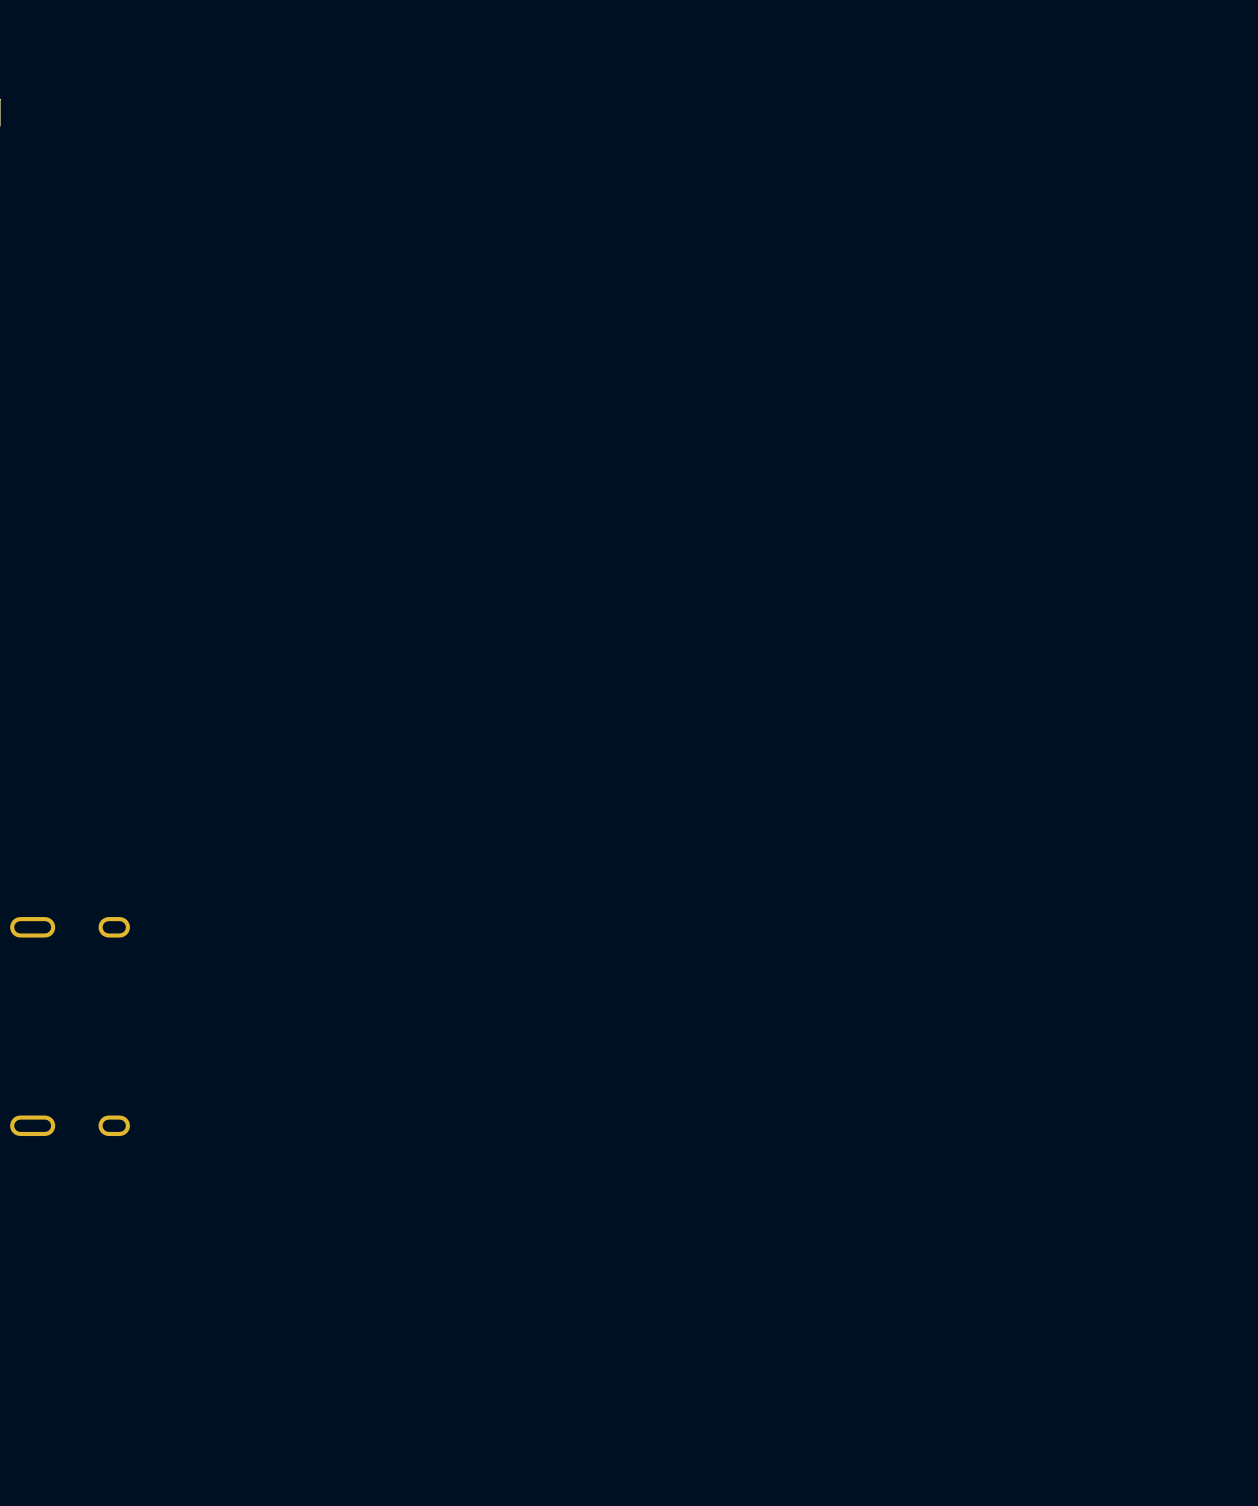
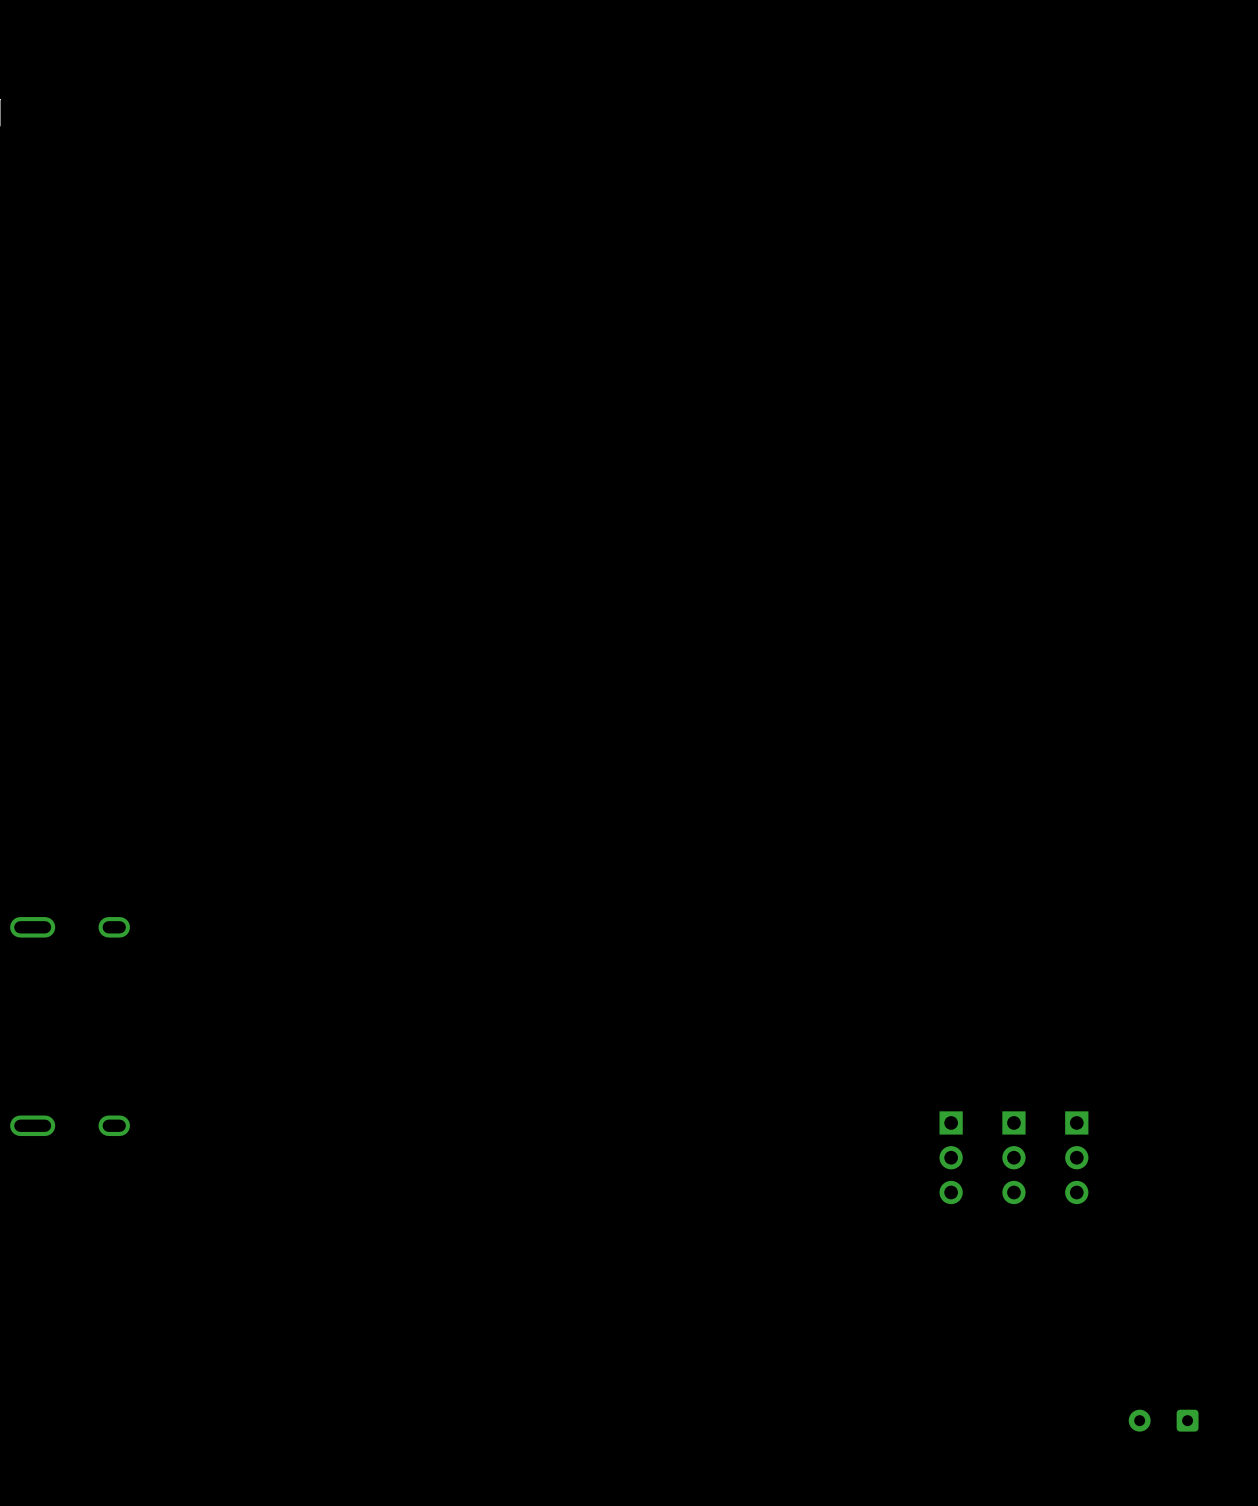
part: none -> (951, 1157)
part: none -> (1013, 1157)
part: none -> (1076, 1157)
part: none -> (1163, 1420)

